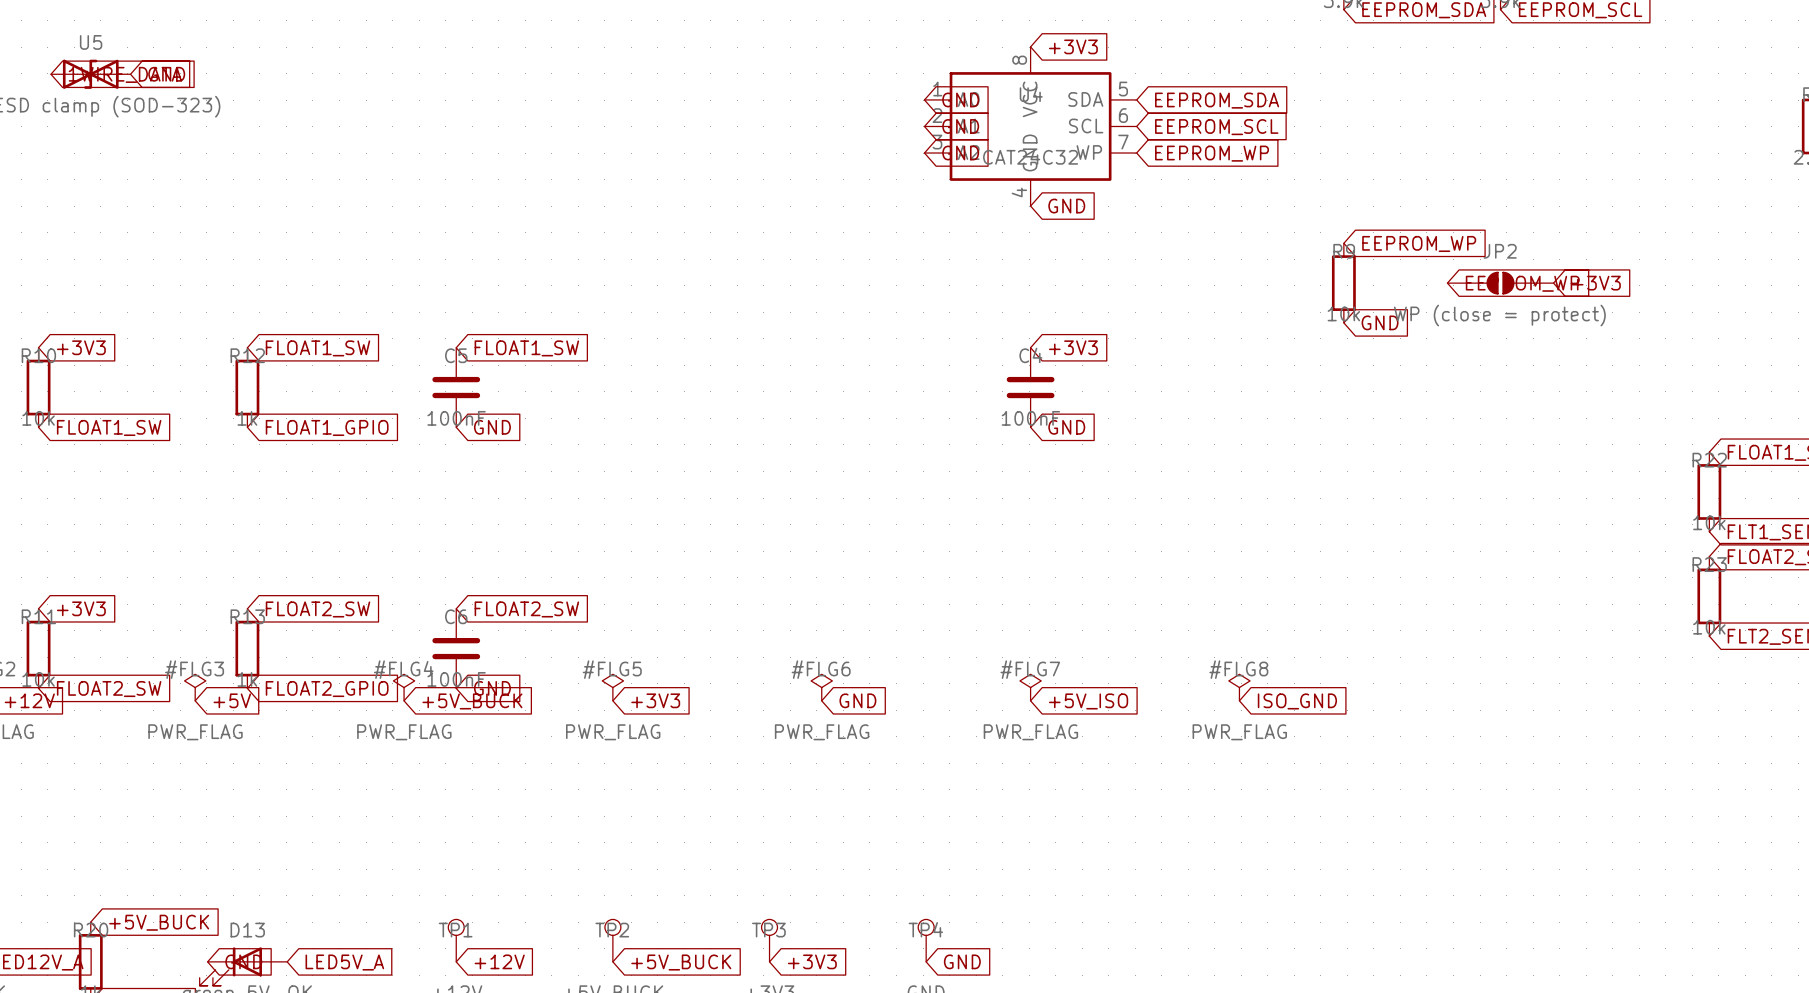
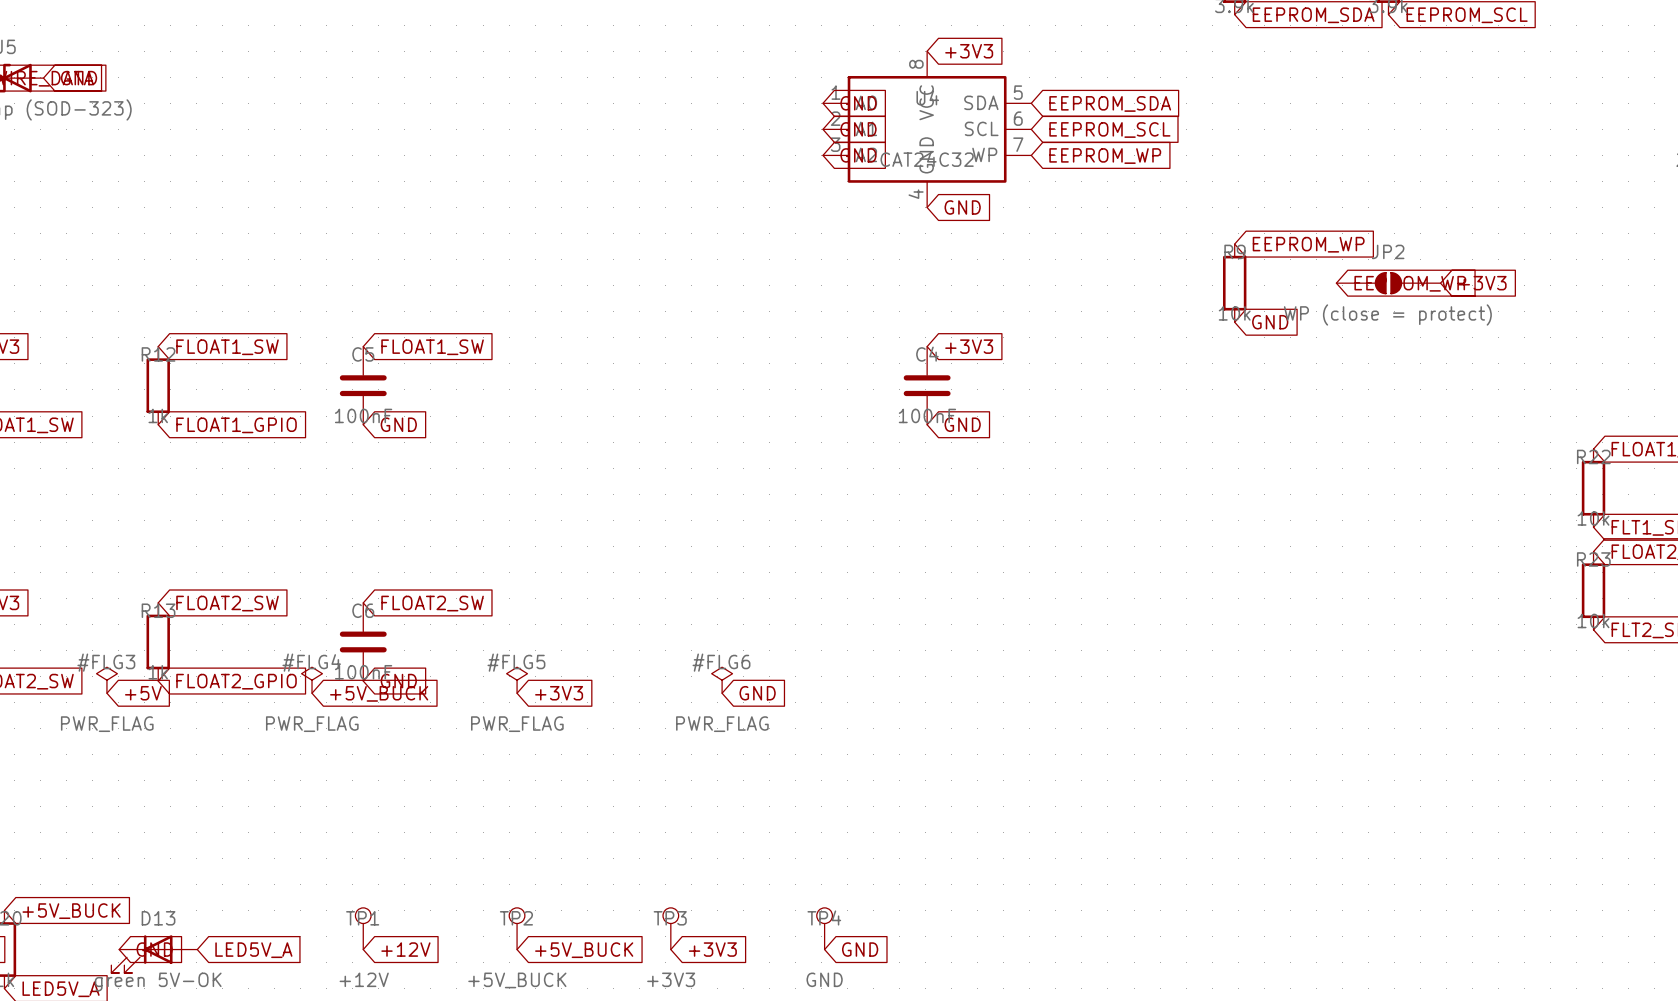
#FLG7: PWR_FLAG (1030, 687) -> none
#FLG8: PWR_FLAG (1239, 687) -> none
global label: +5V_ISO (1088, 701) -> none
global label: ISO_GND (1297, 701) -> none

